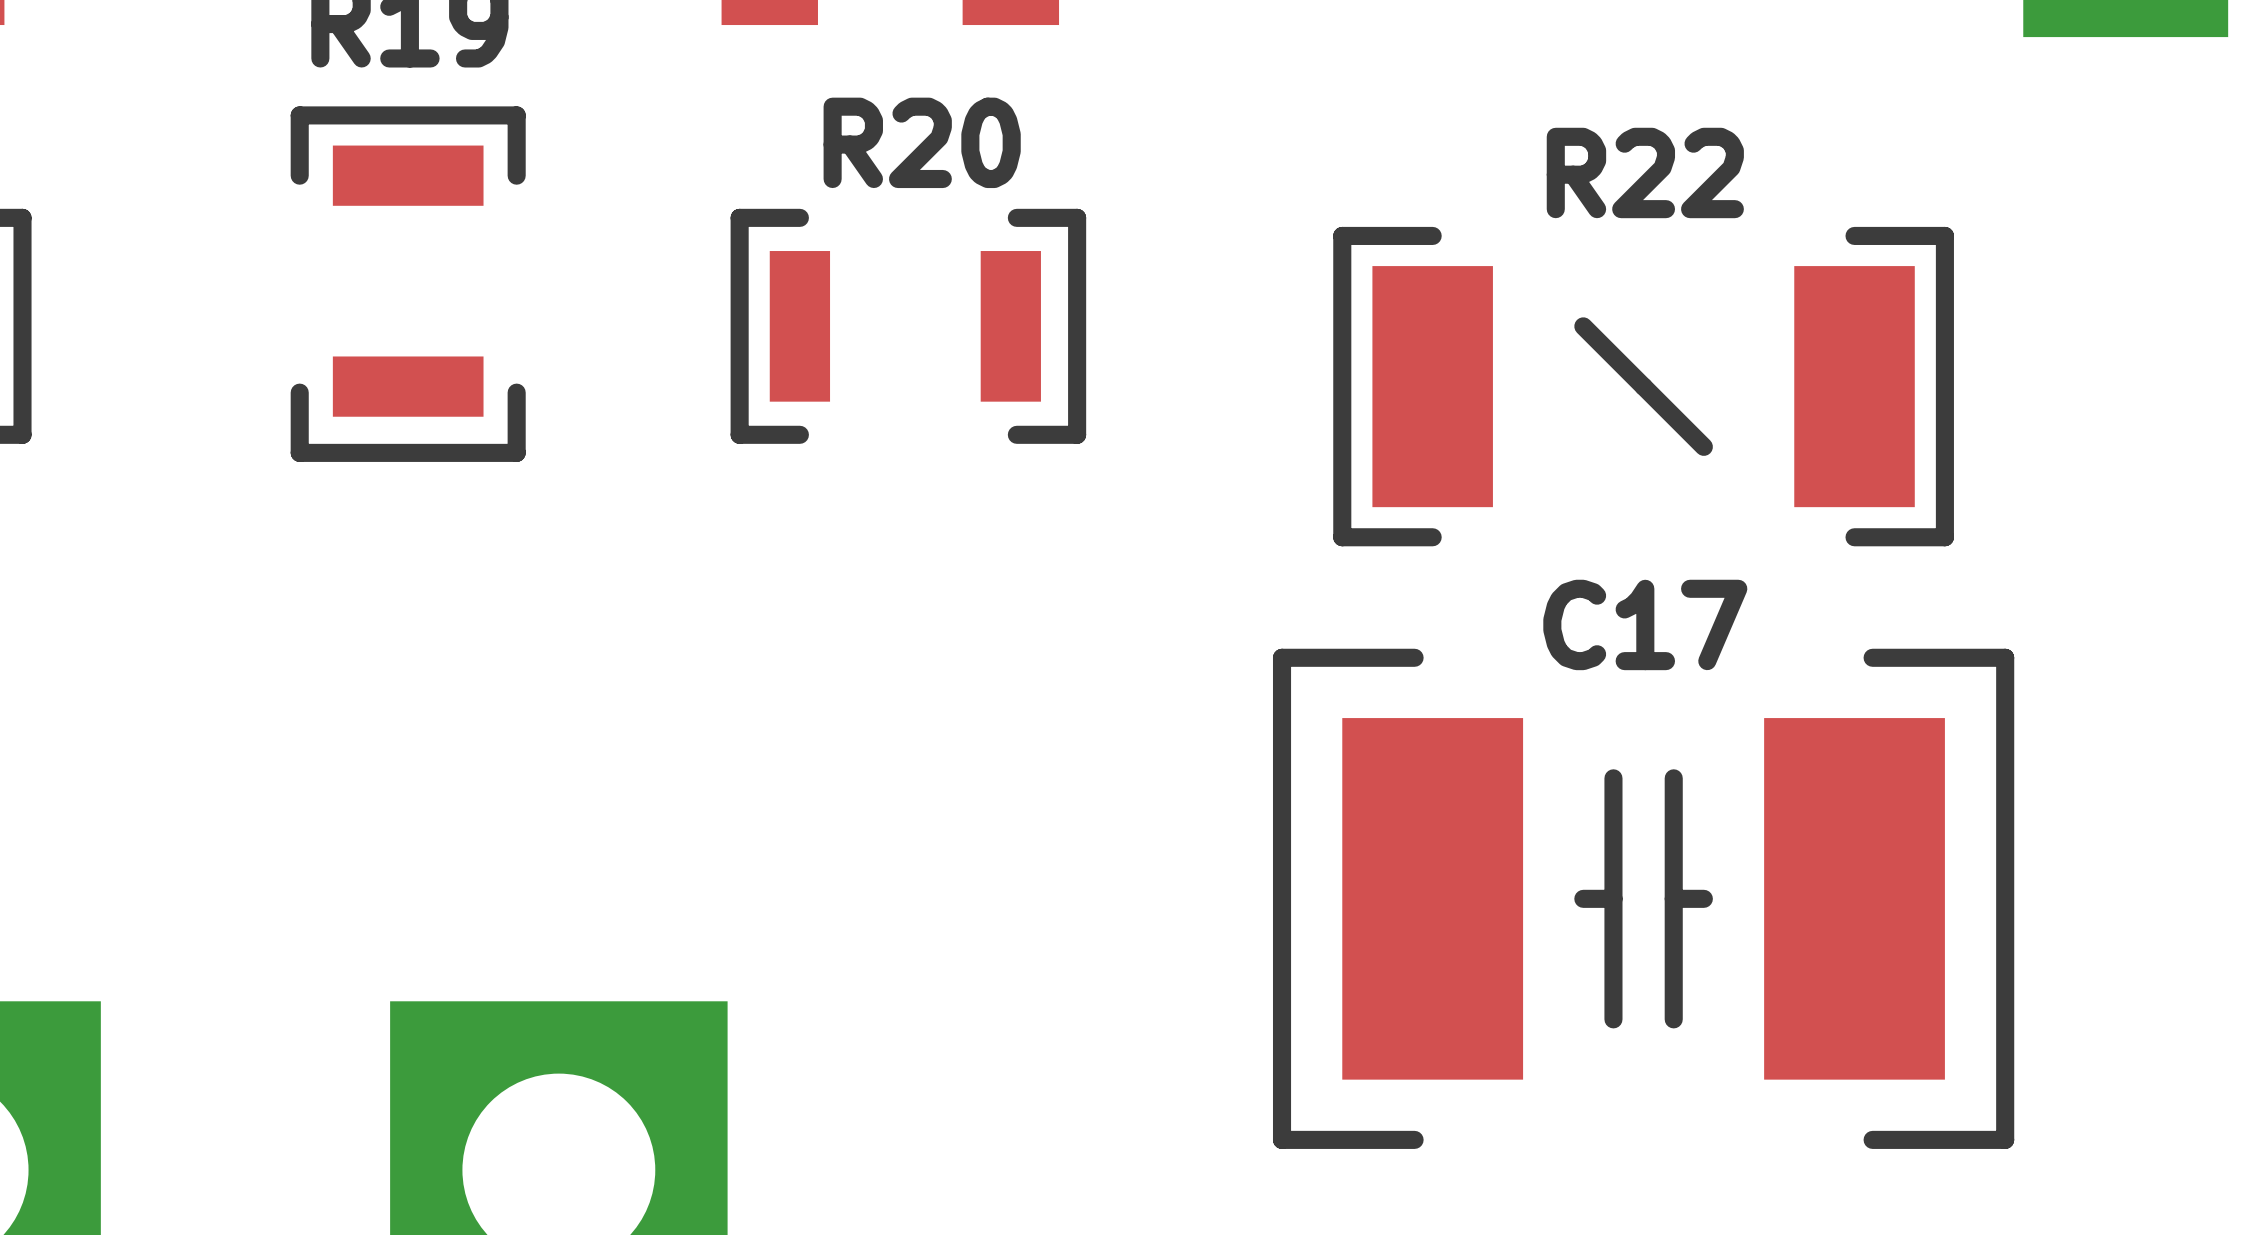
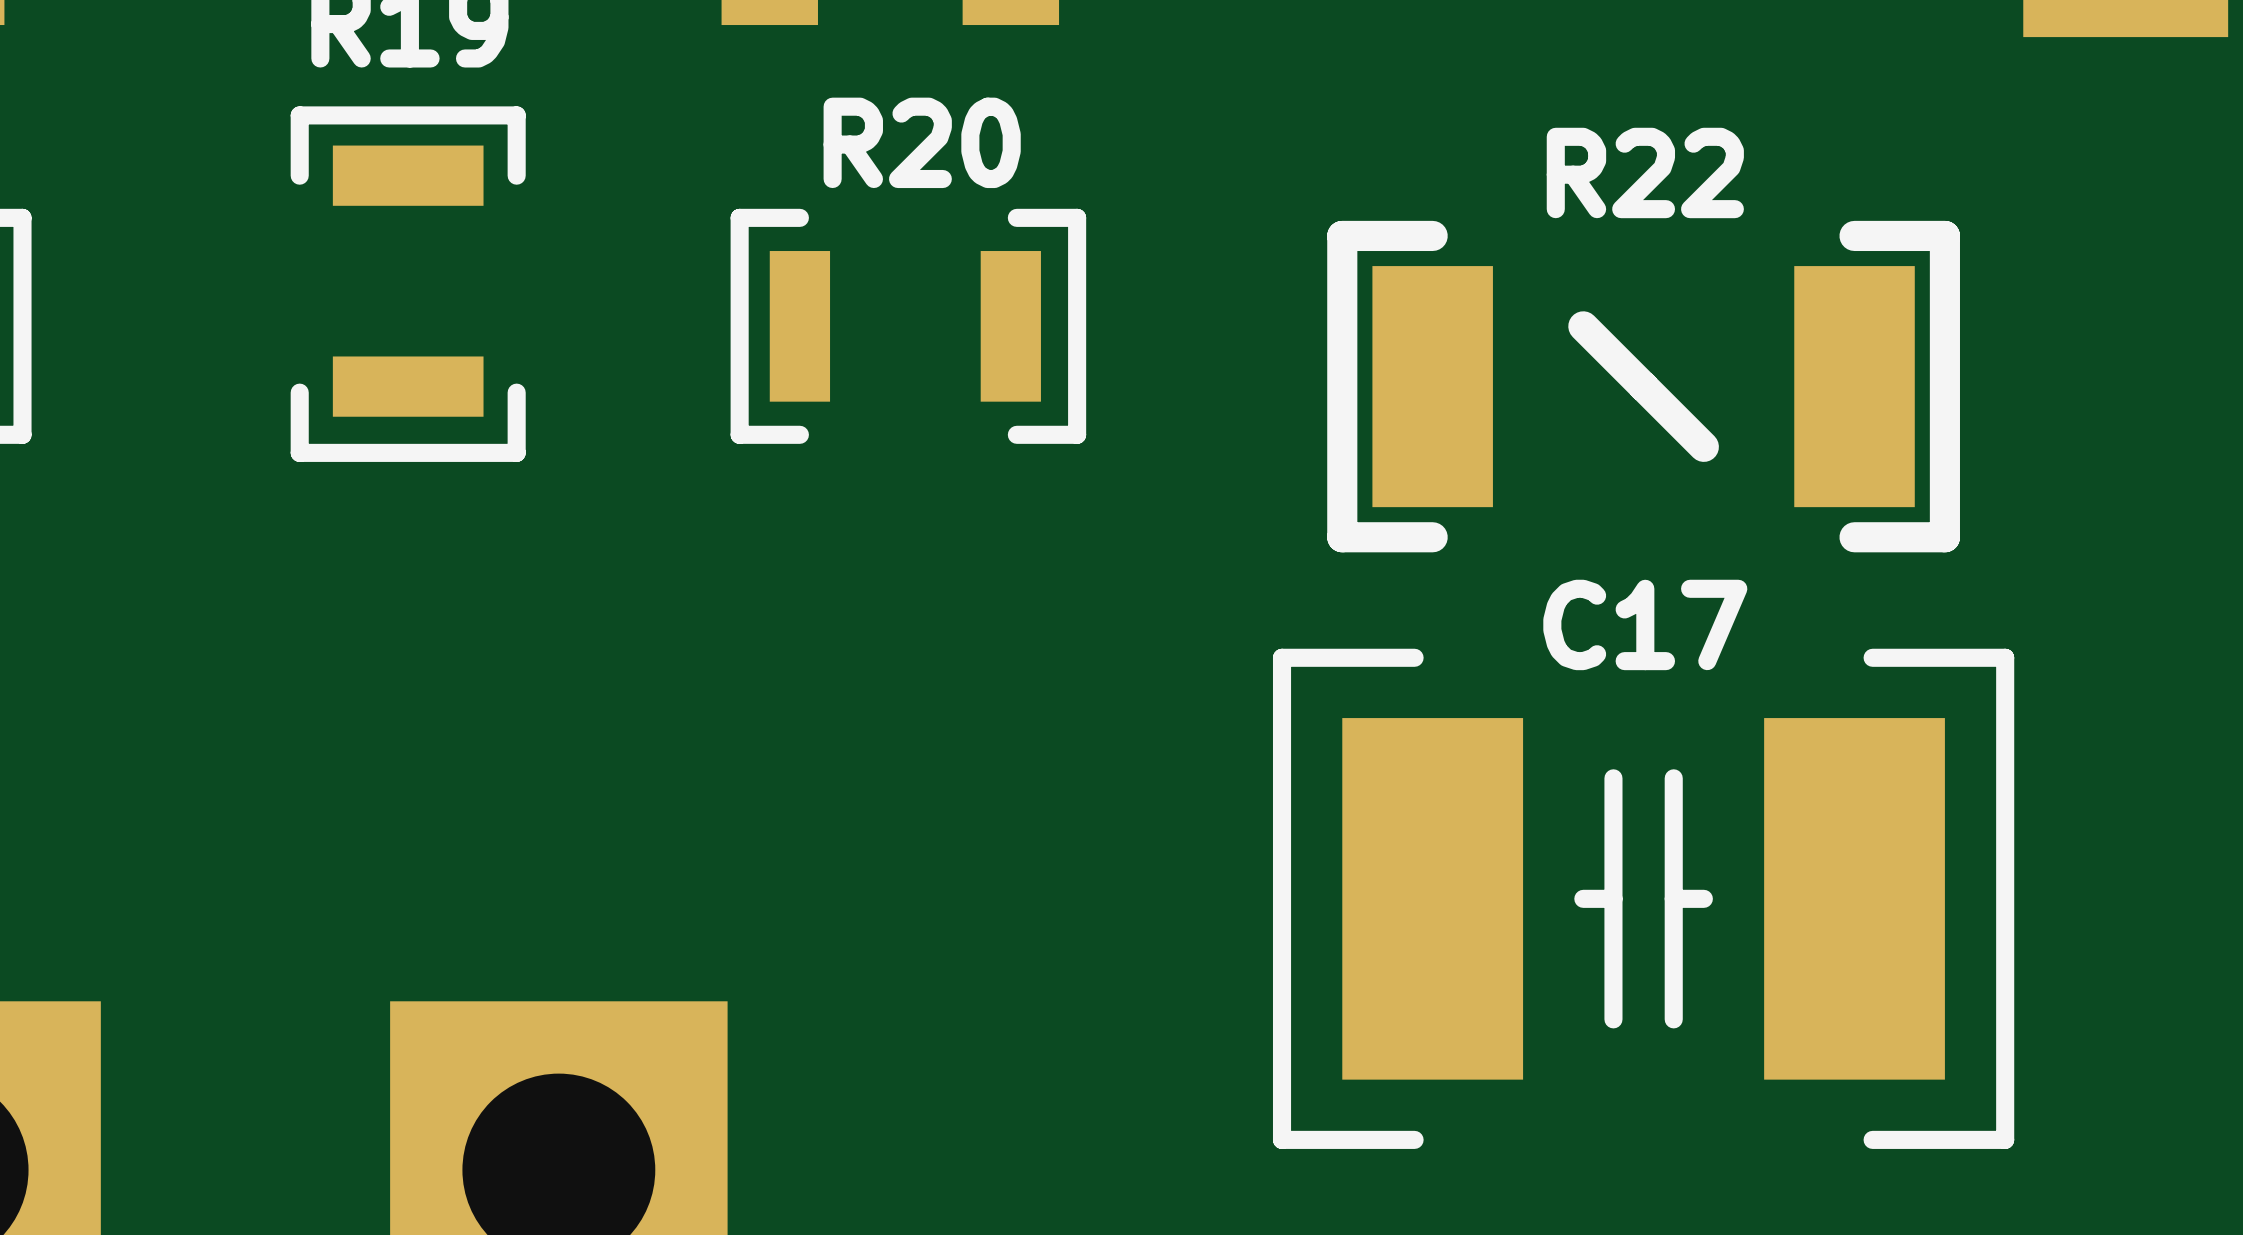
R22 footprint: [1333, 226, 1954, 547] -> [1327, 220, 1960, 553]

